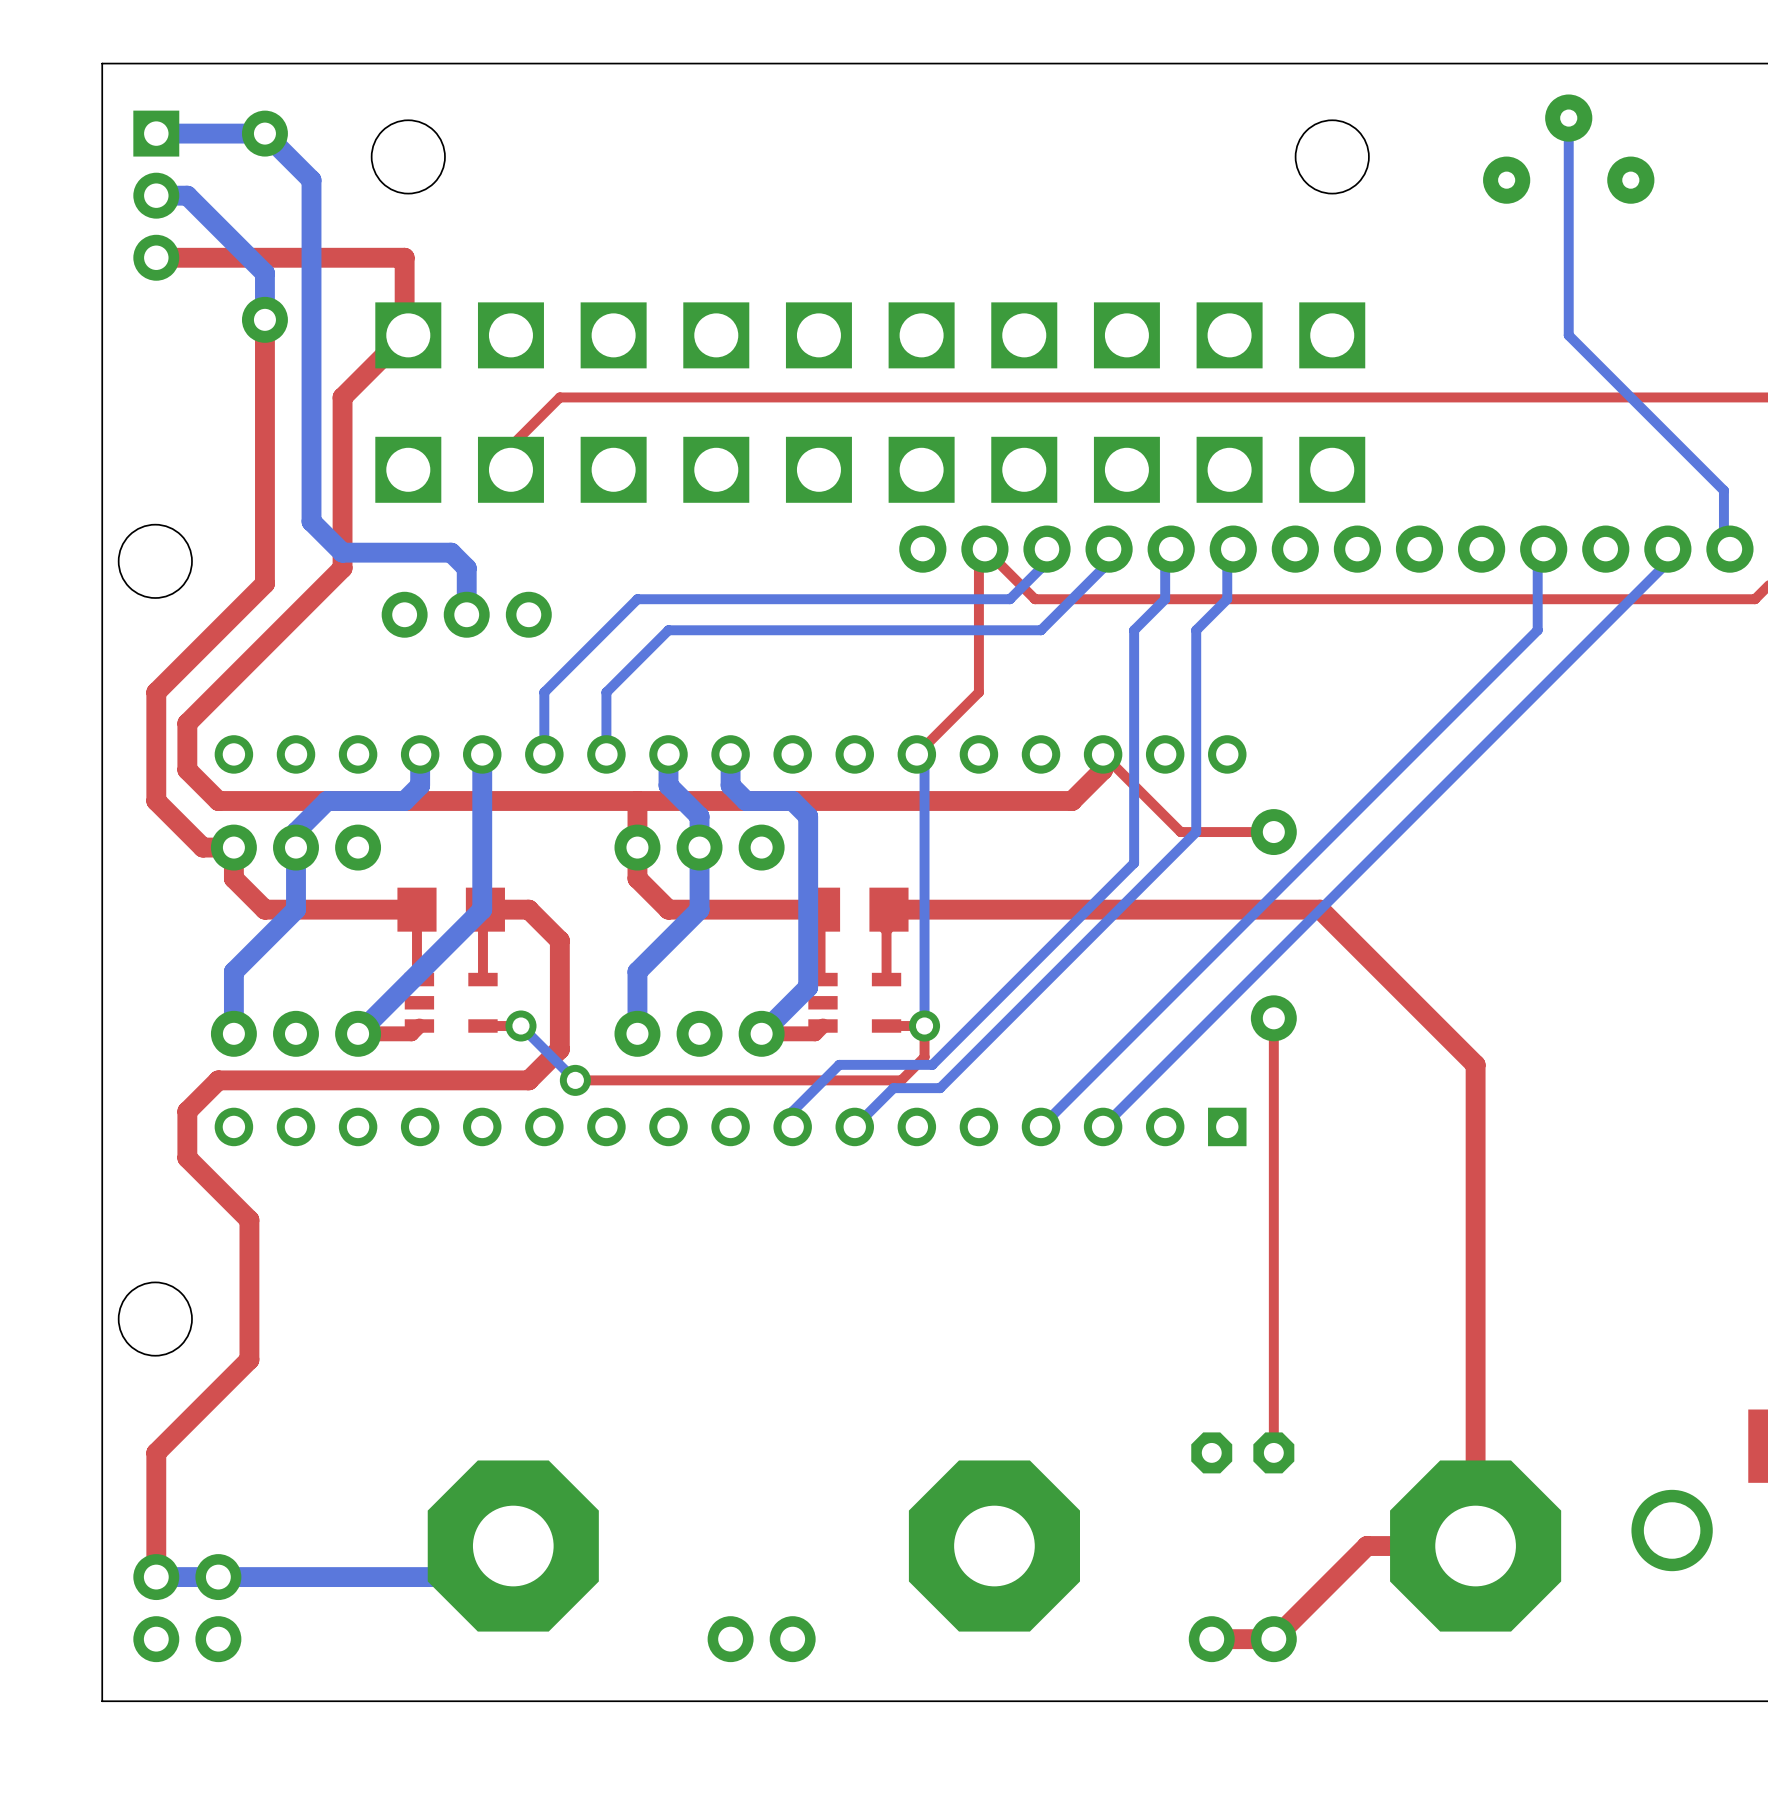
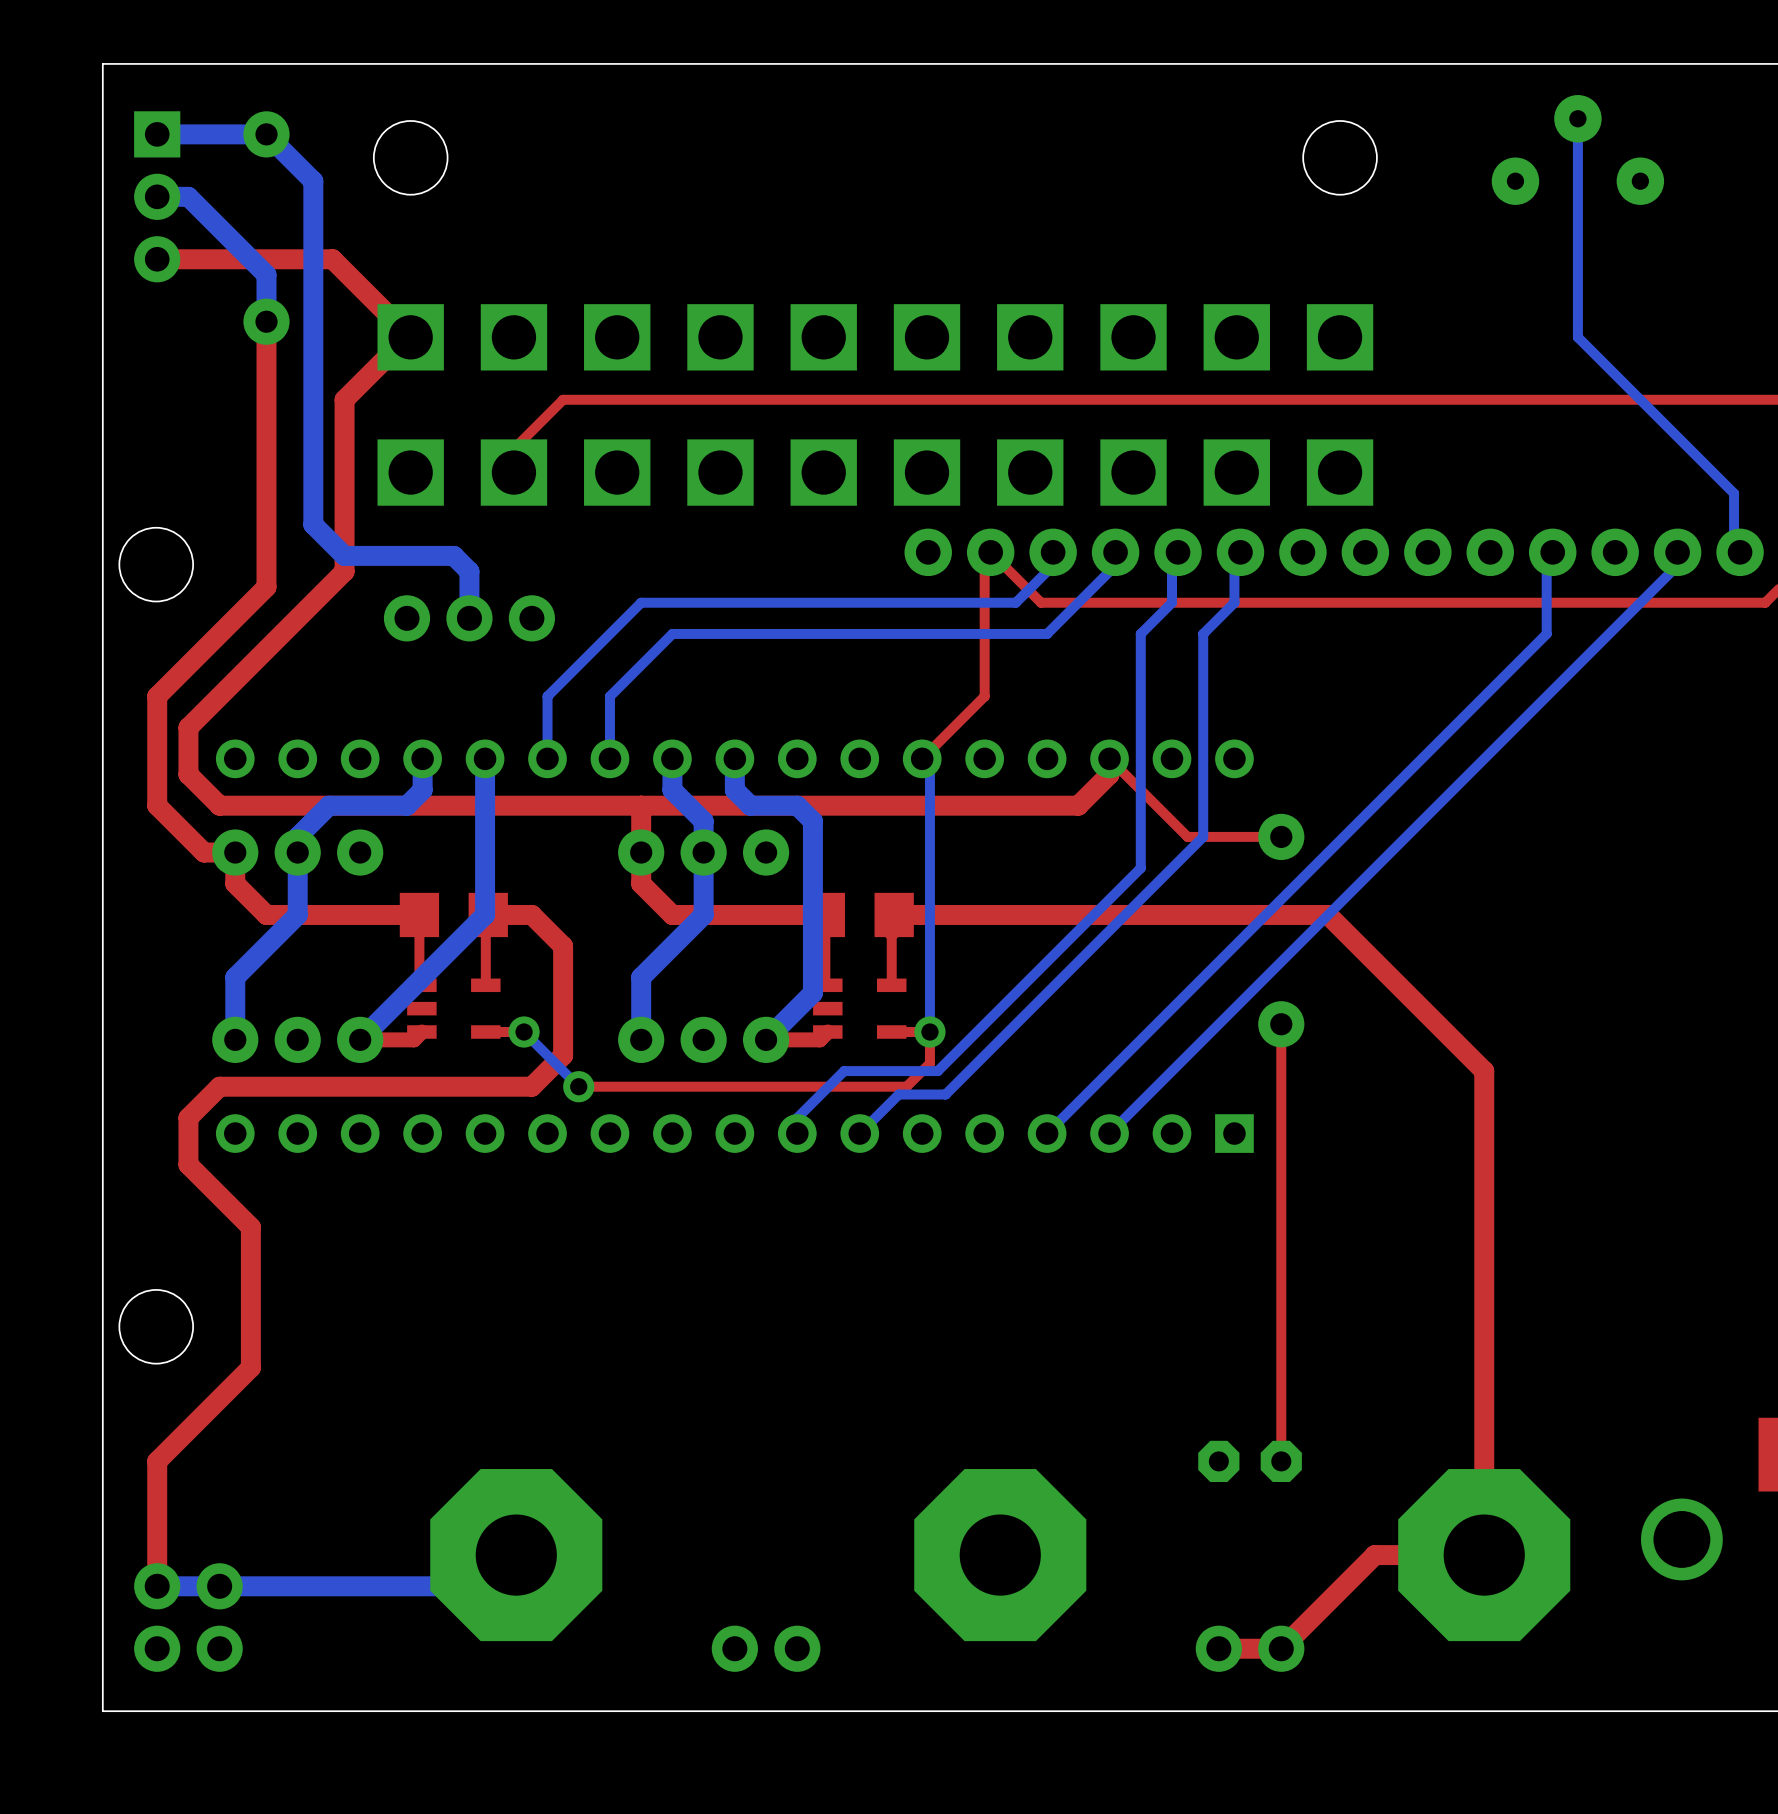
top track: (330, 257) (404, 257) (404, 331) -> (332, 259) (407, 333)

